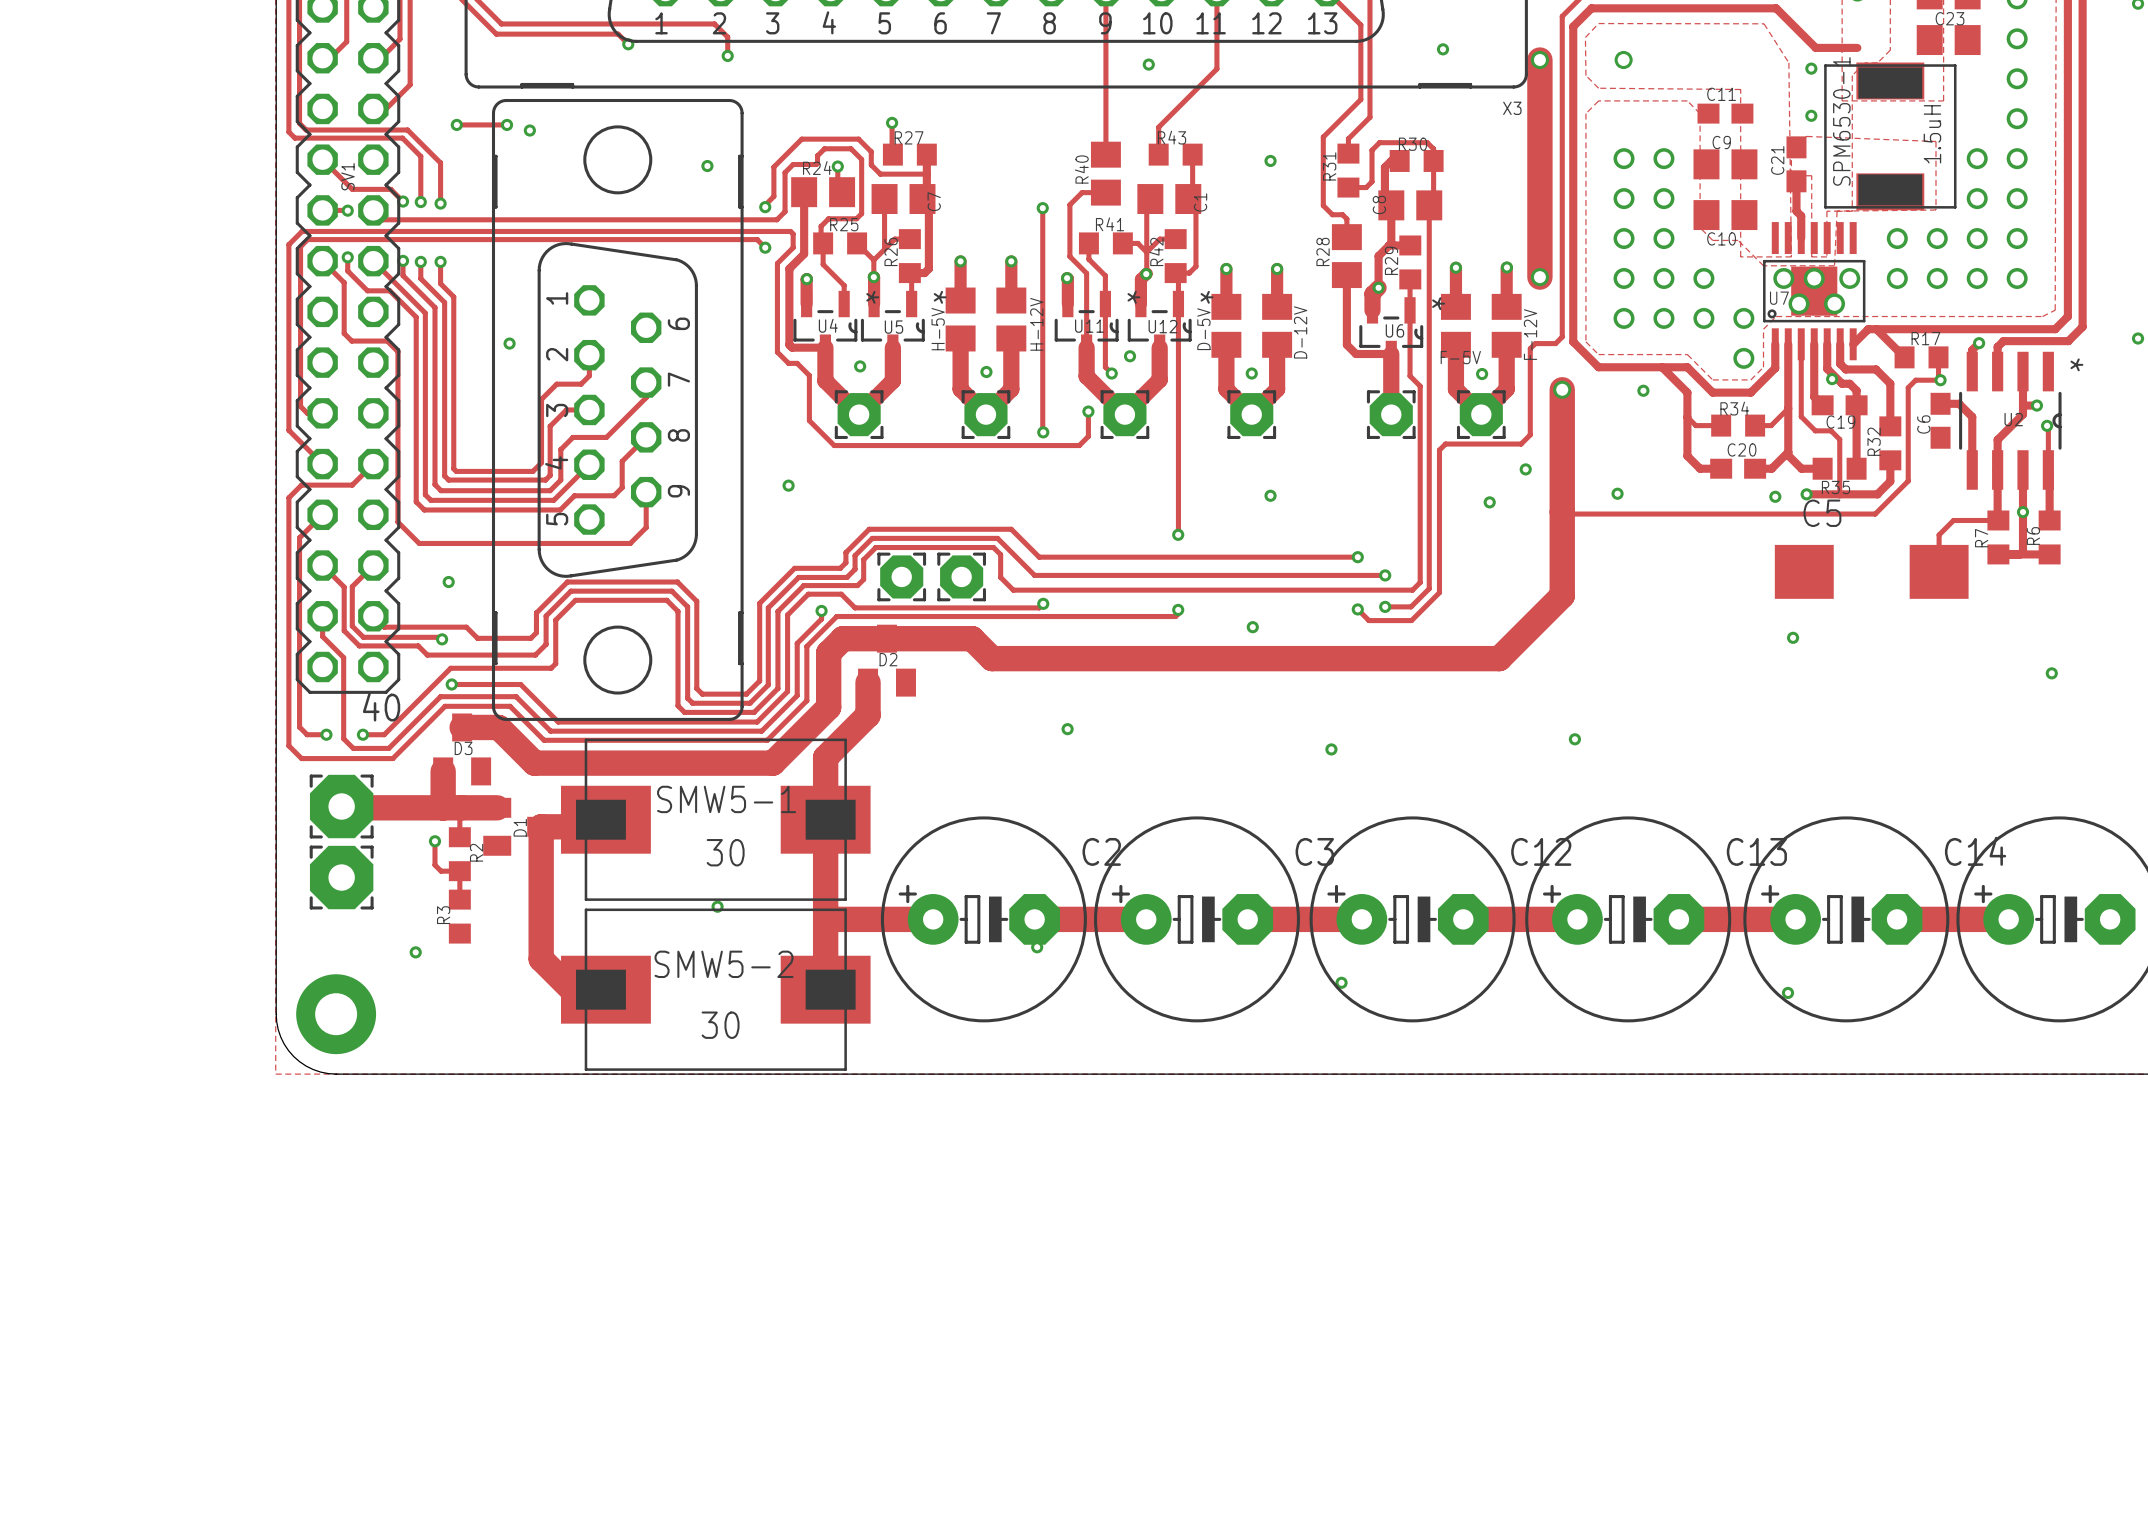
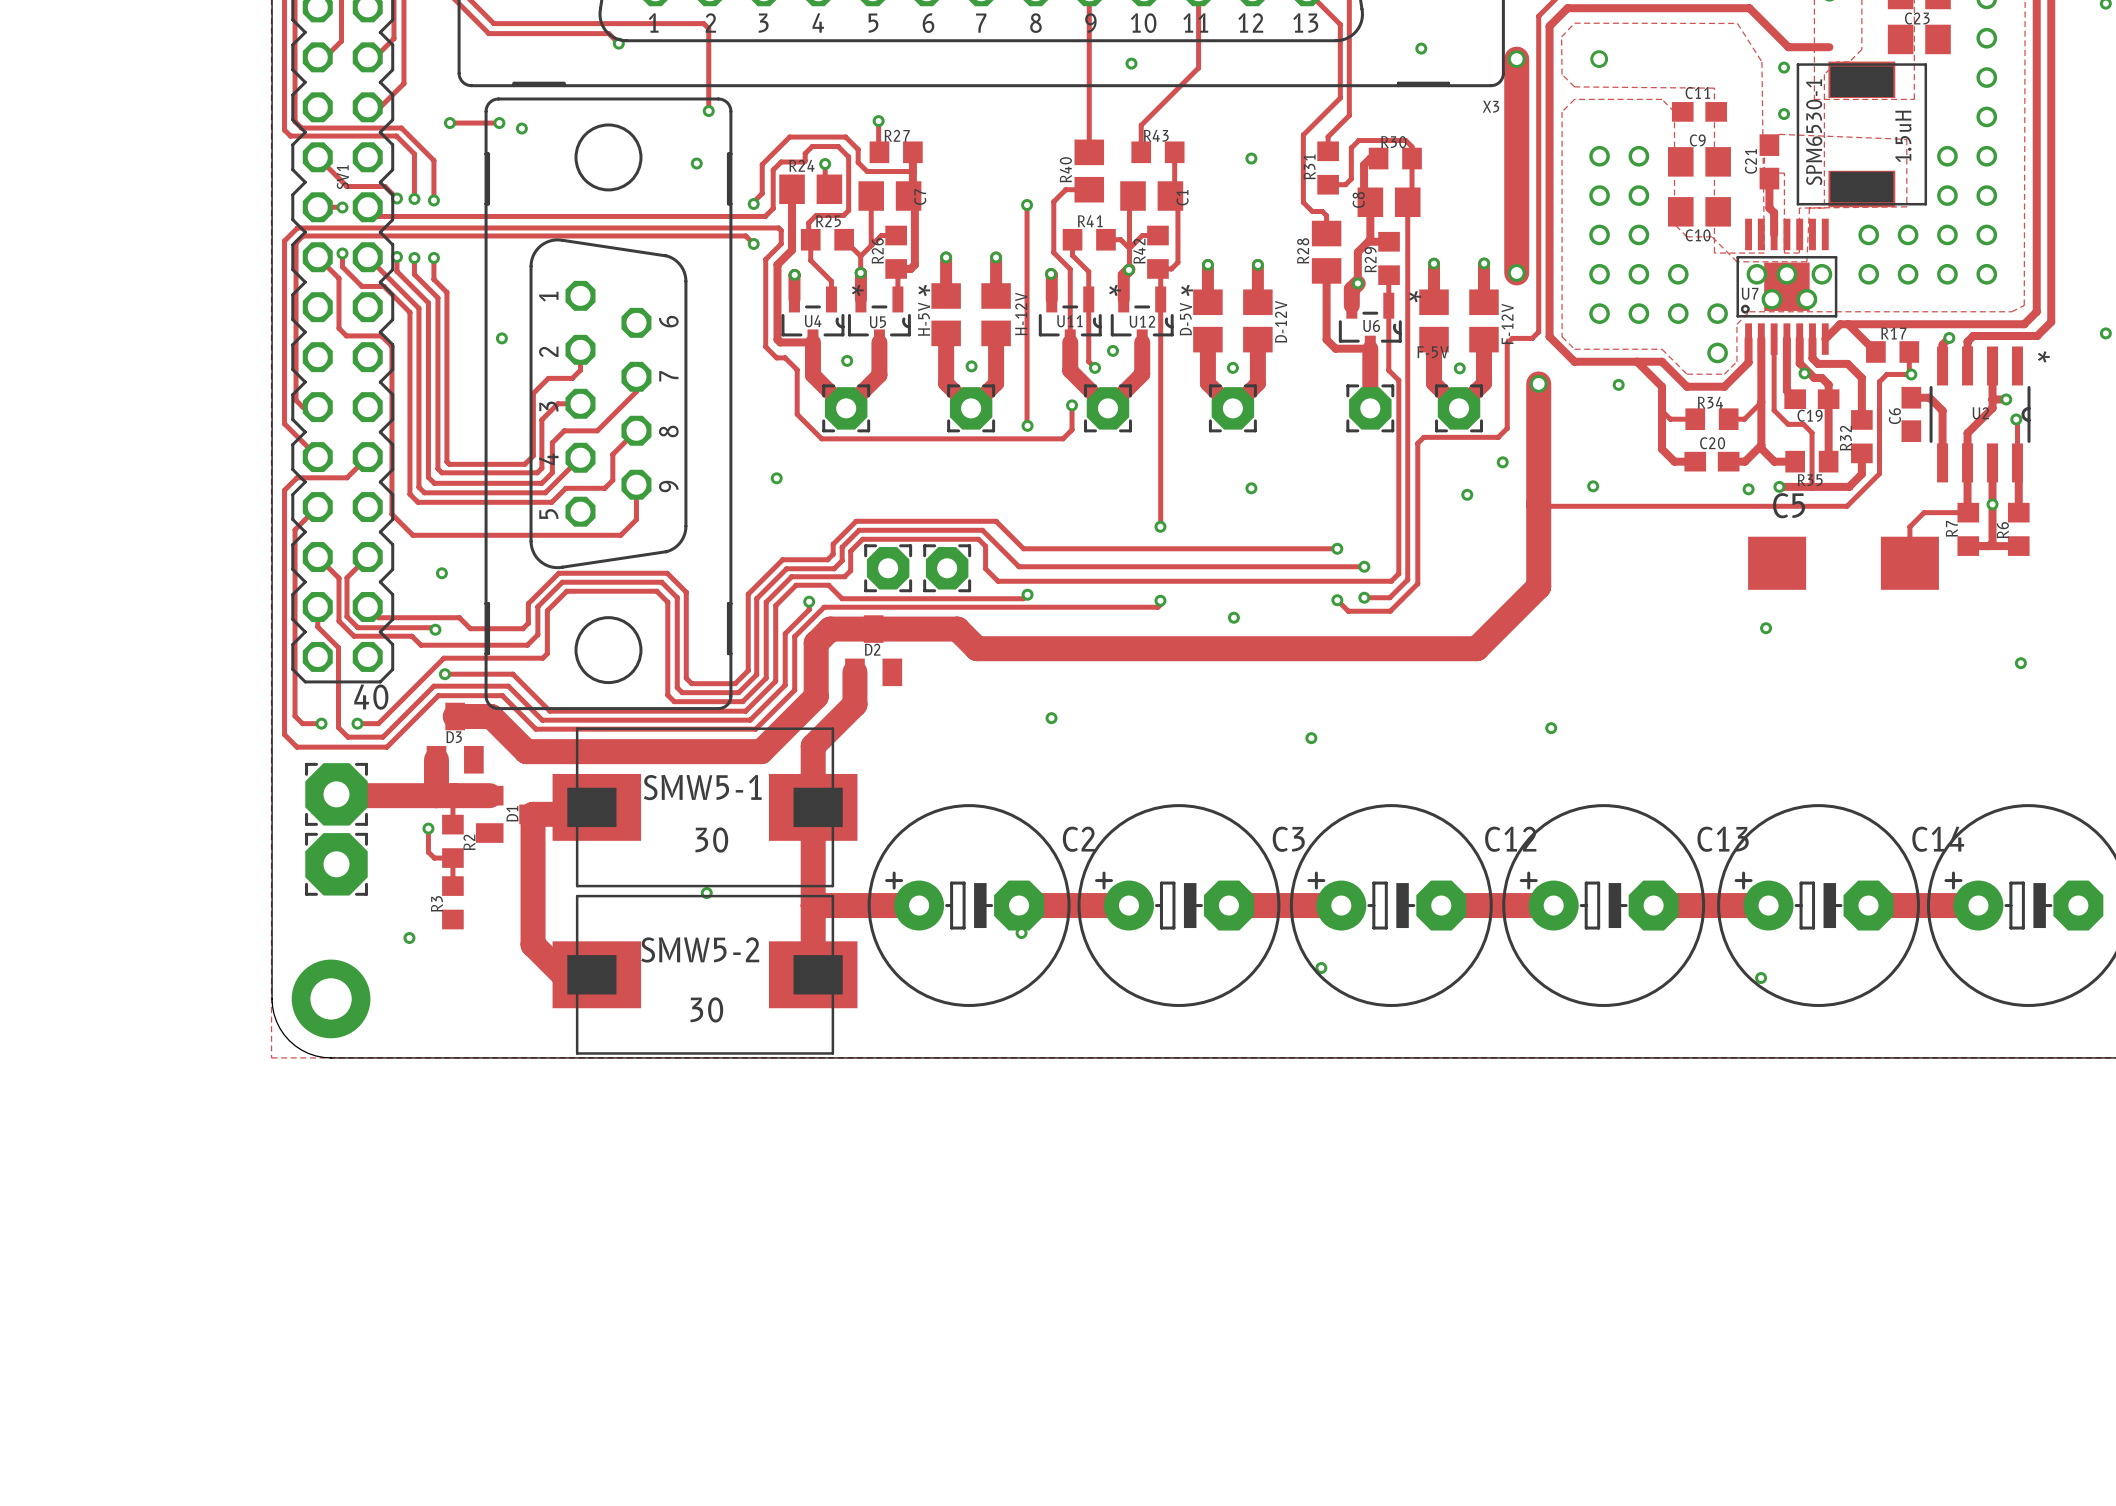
track: (719, 29) (727, 37) (727, 55) -> (708, 28) (708, 111)
via position: (727, 55) -> (708, 111)

